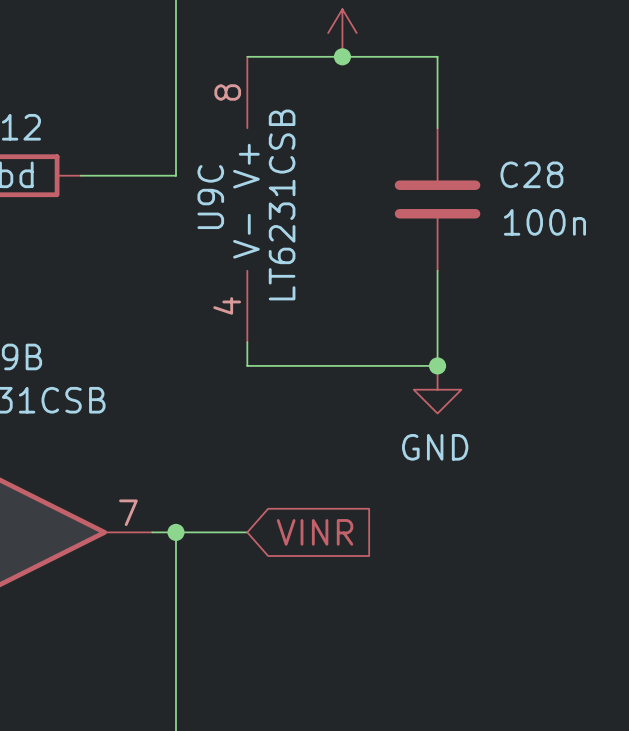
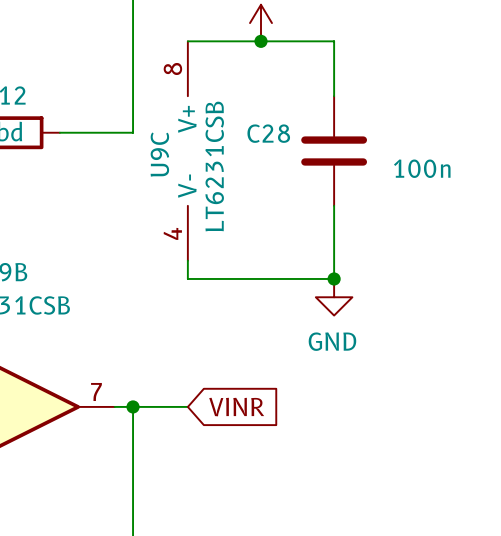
C28 name position: C28 (531, 174) -> C28 (268, 133)

